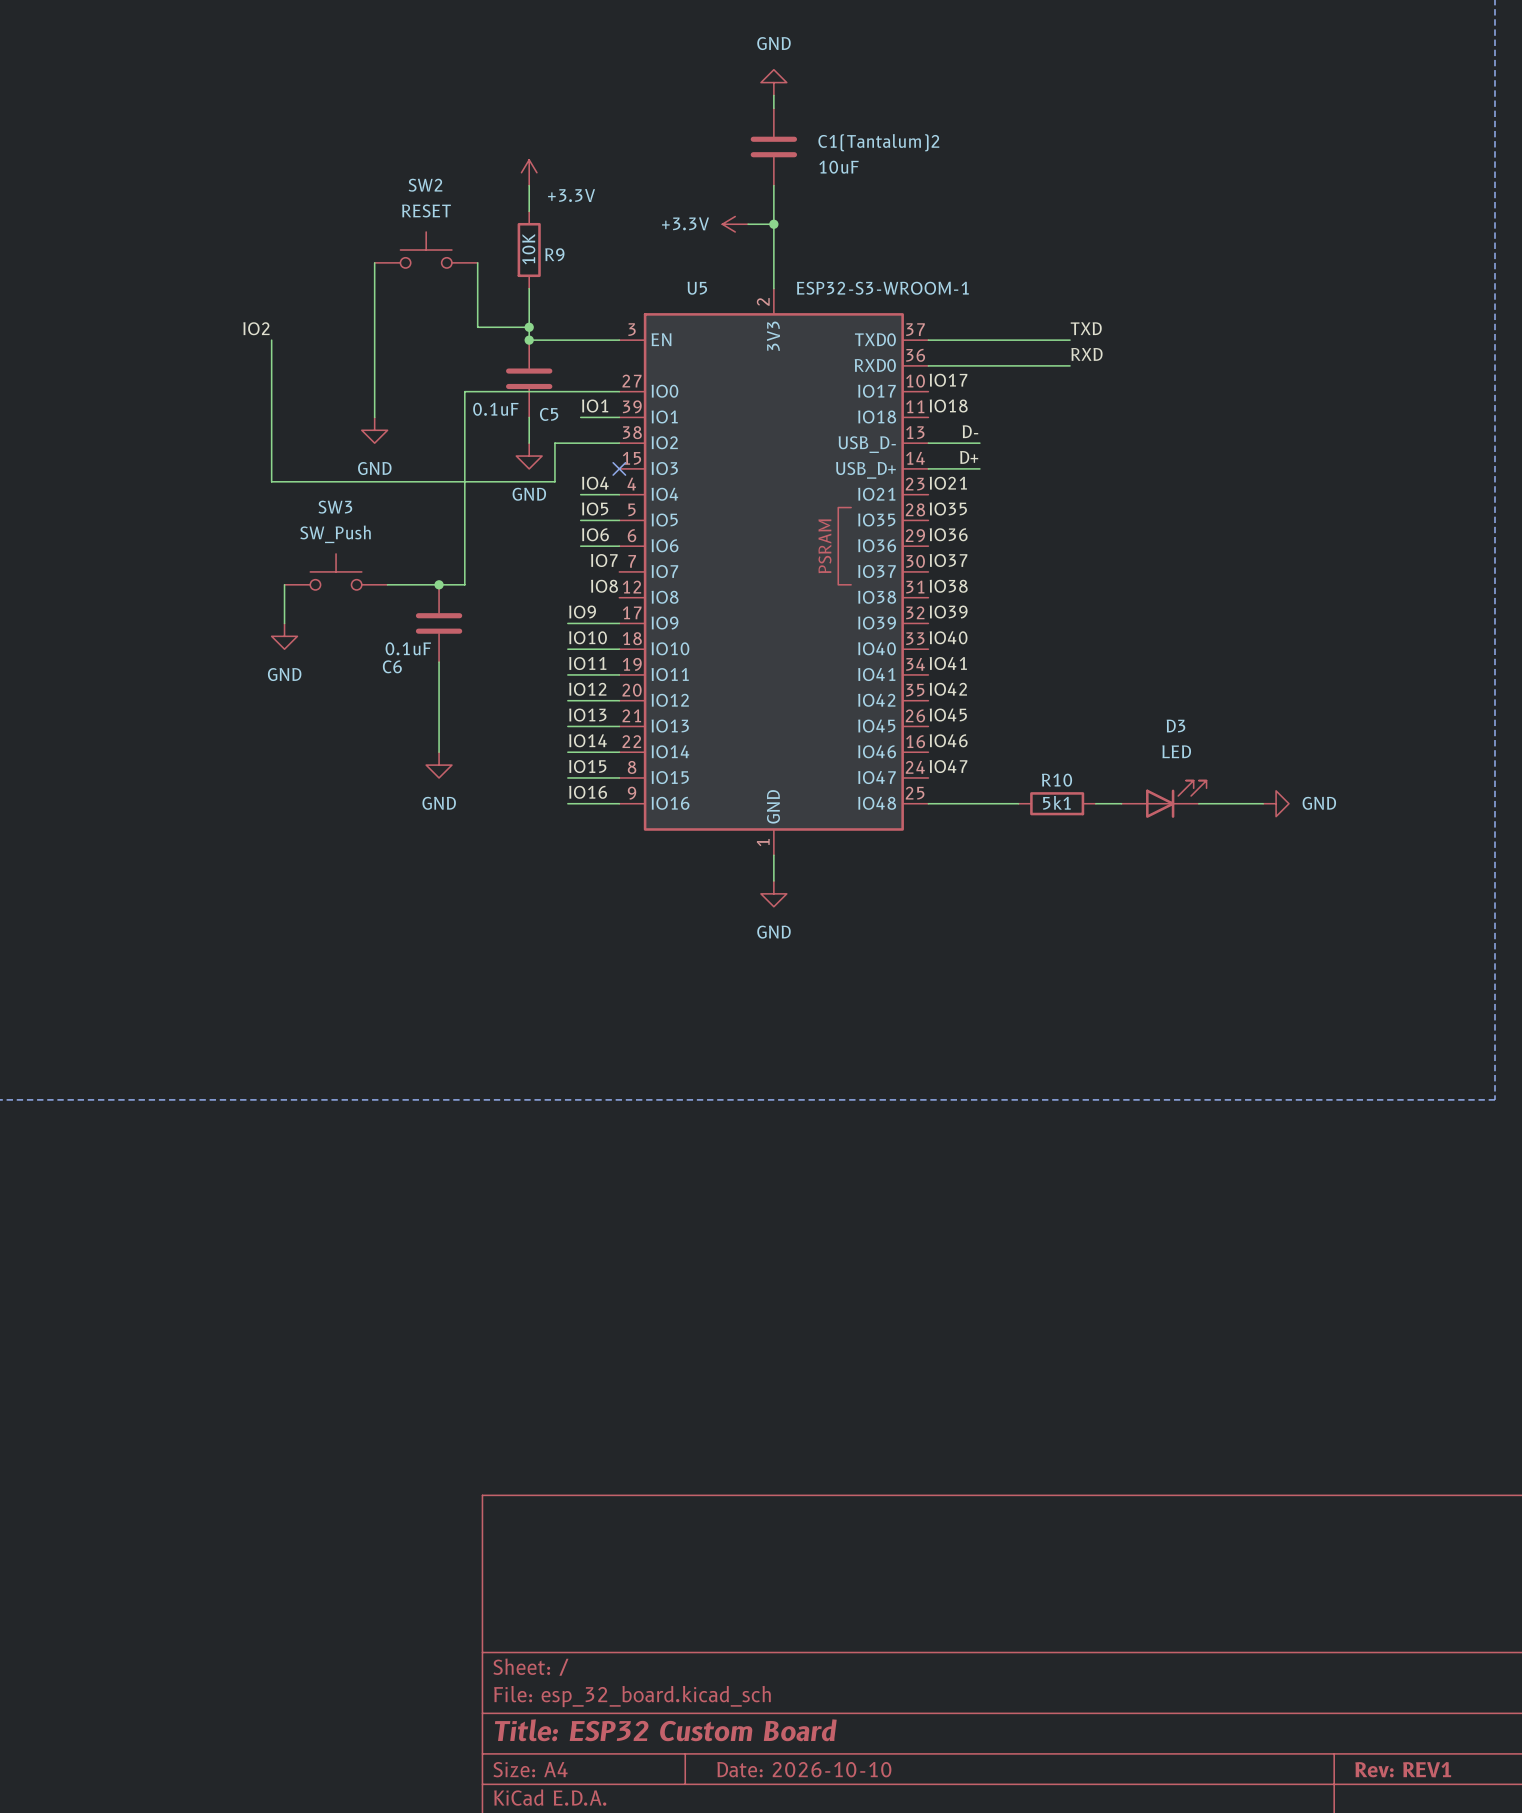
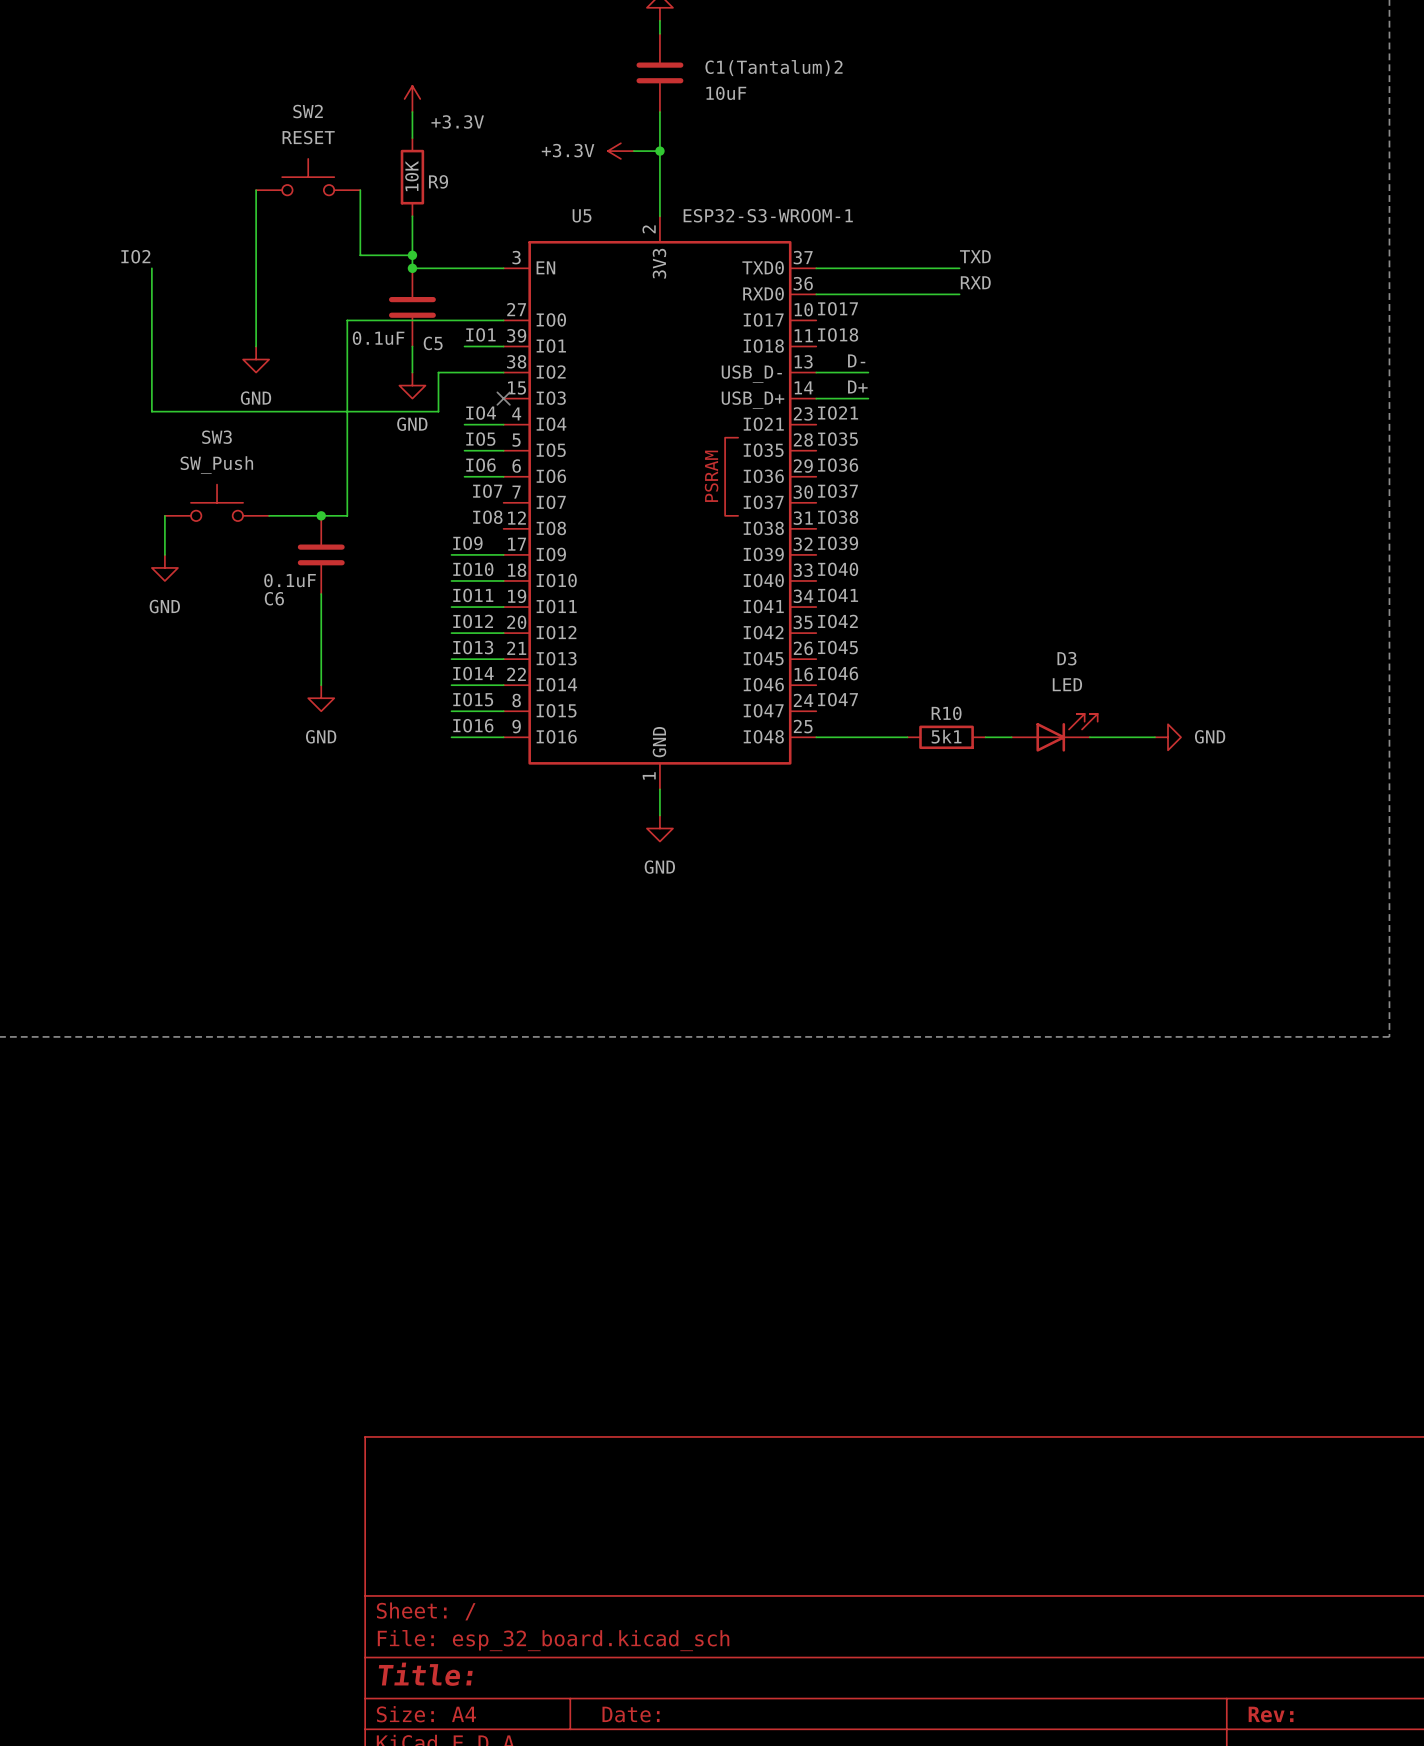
title block: Title: ESP32 Custom Board (665, 1730) -> Title: (425, 1674)
title block: Date: 2026-10-10 (804, 1769) -> Date: (631, 1714)
title block: Rev: REV1 (1403, 1769) -> Rev: (1271, 1714)

